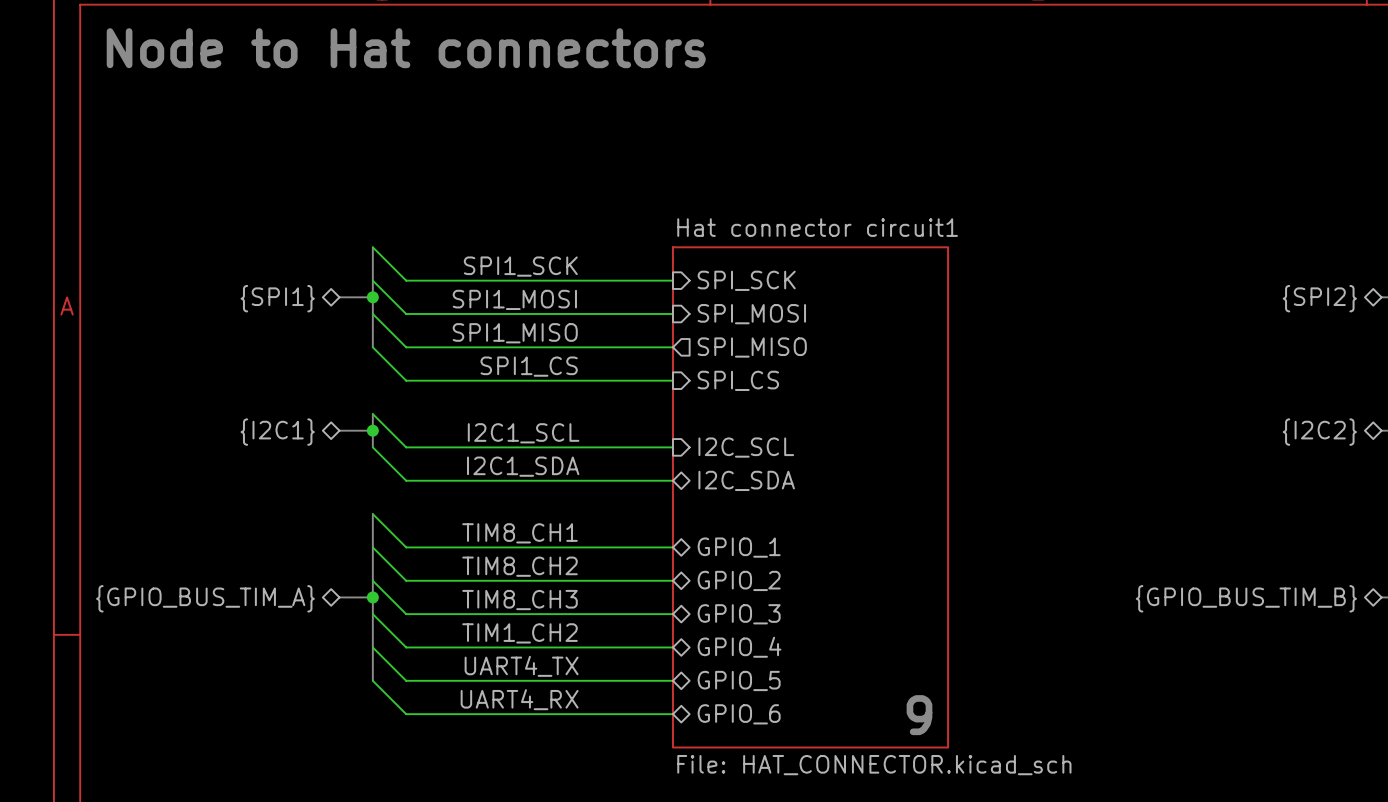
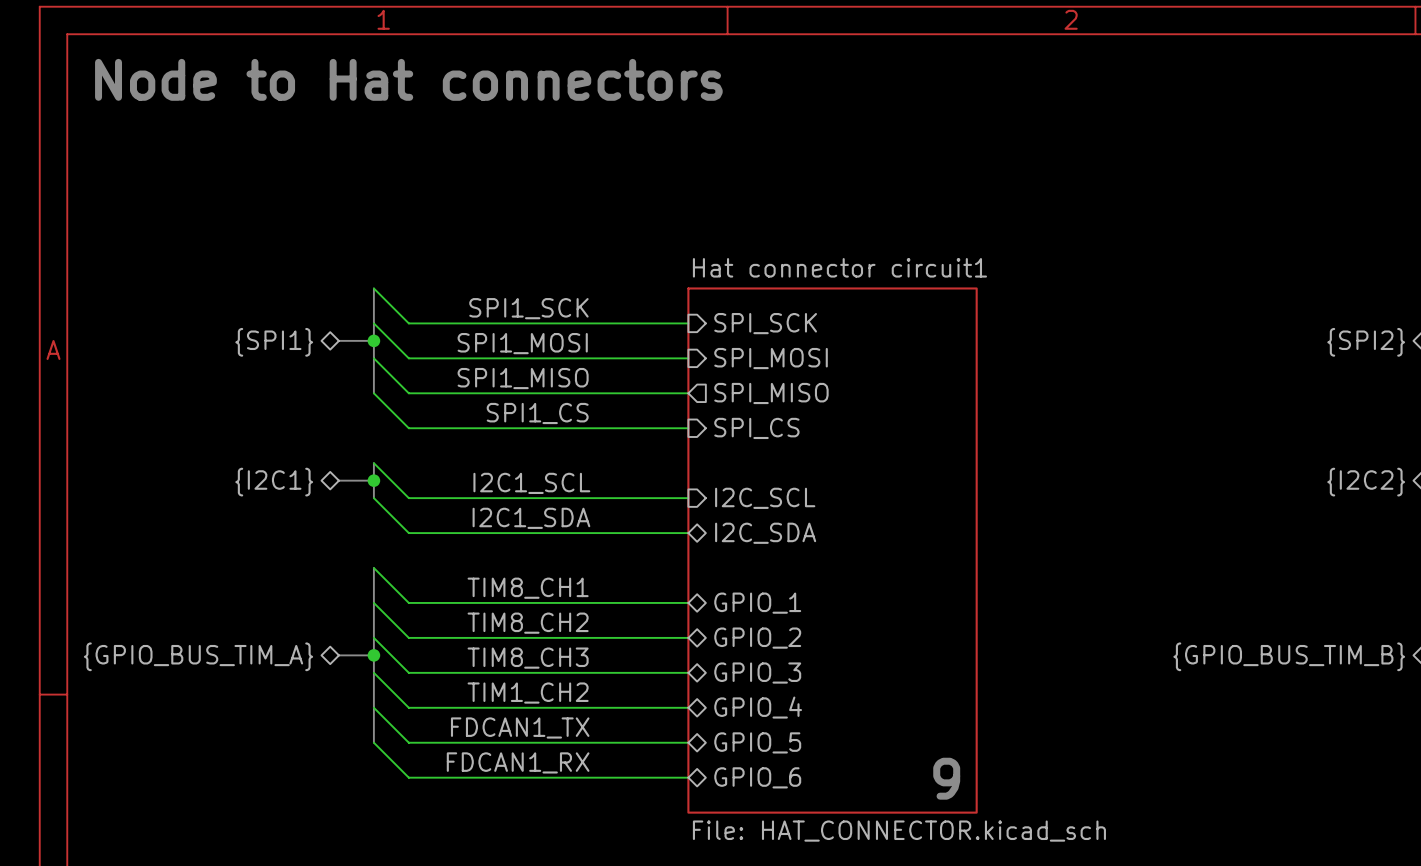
label: UART4_TX (521, 666) -> FDCAN1_TX (520, 727)
label: UART4_RX (519, 699) -> FDCAN1_RX (518, 762)

